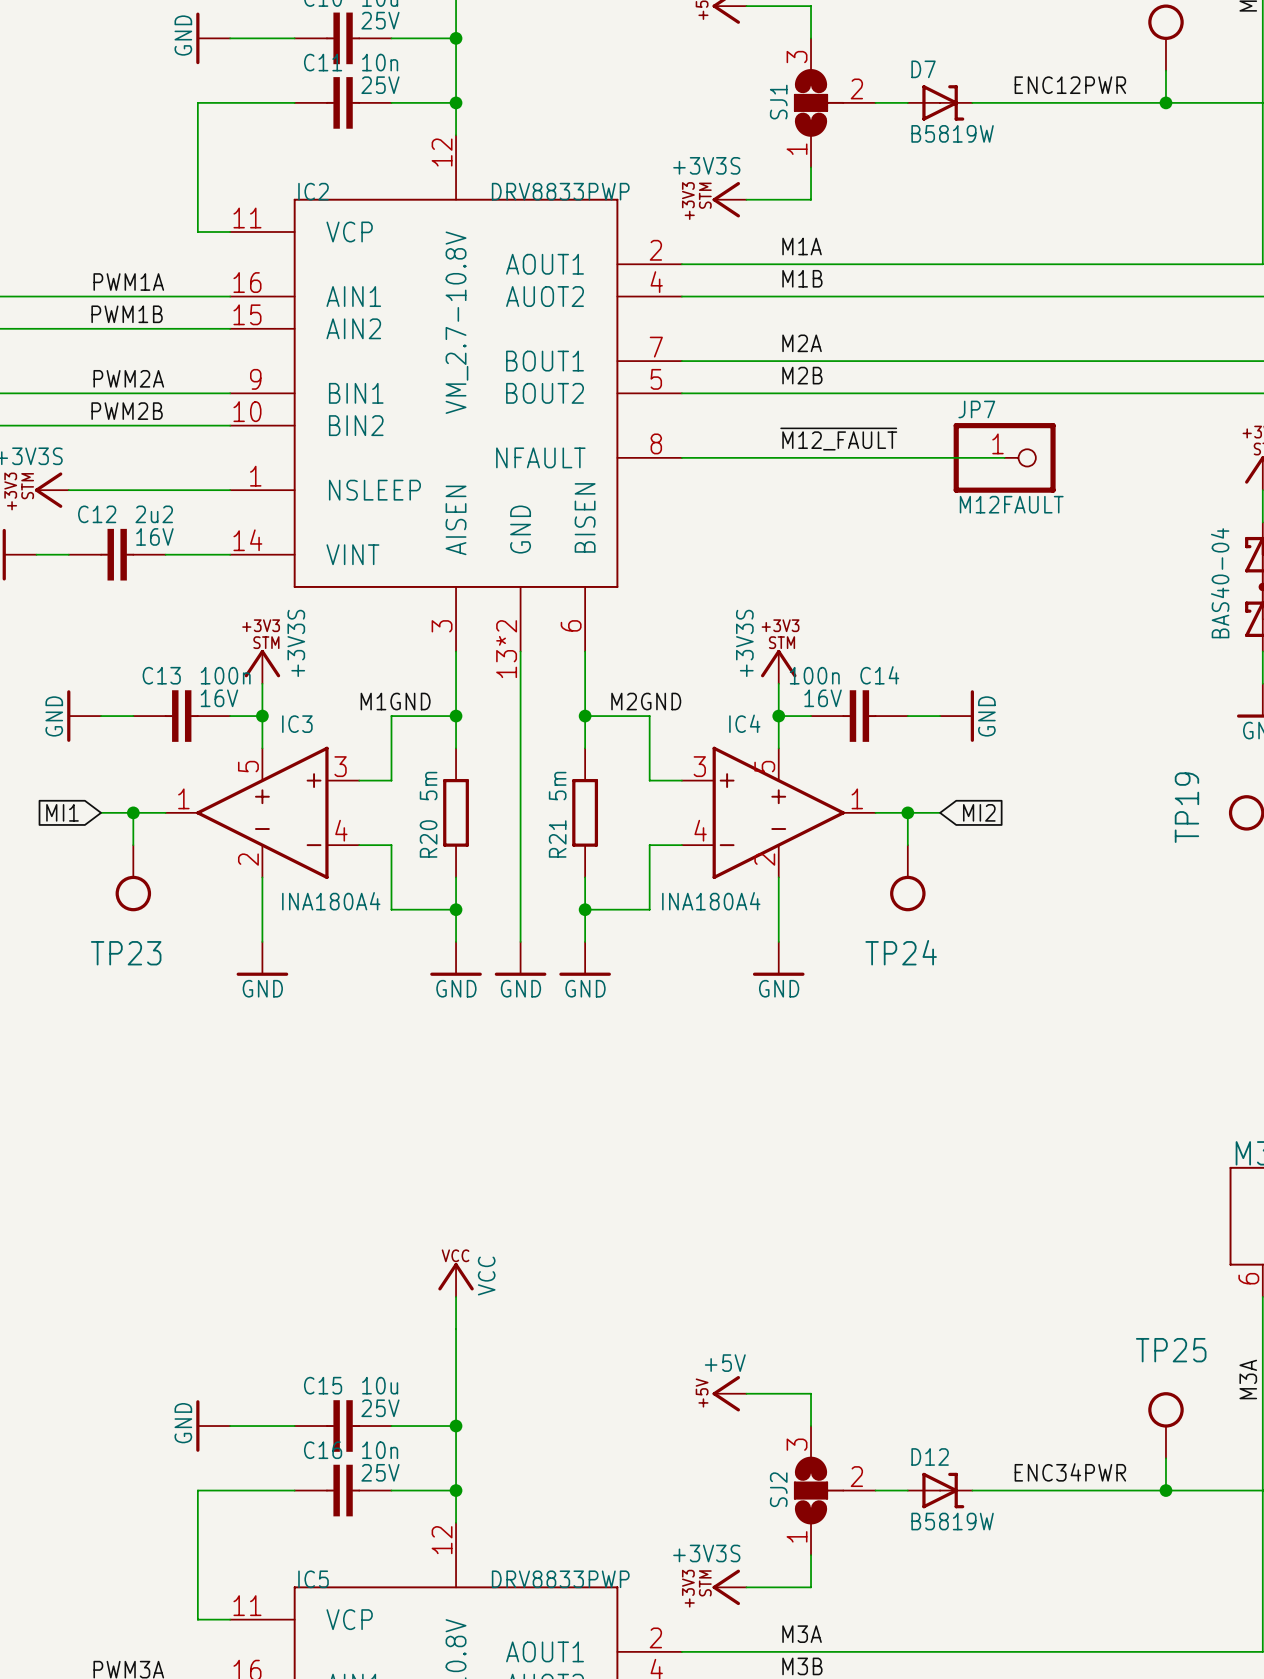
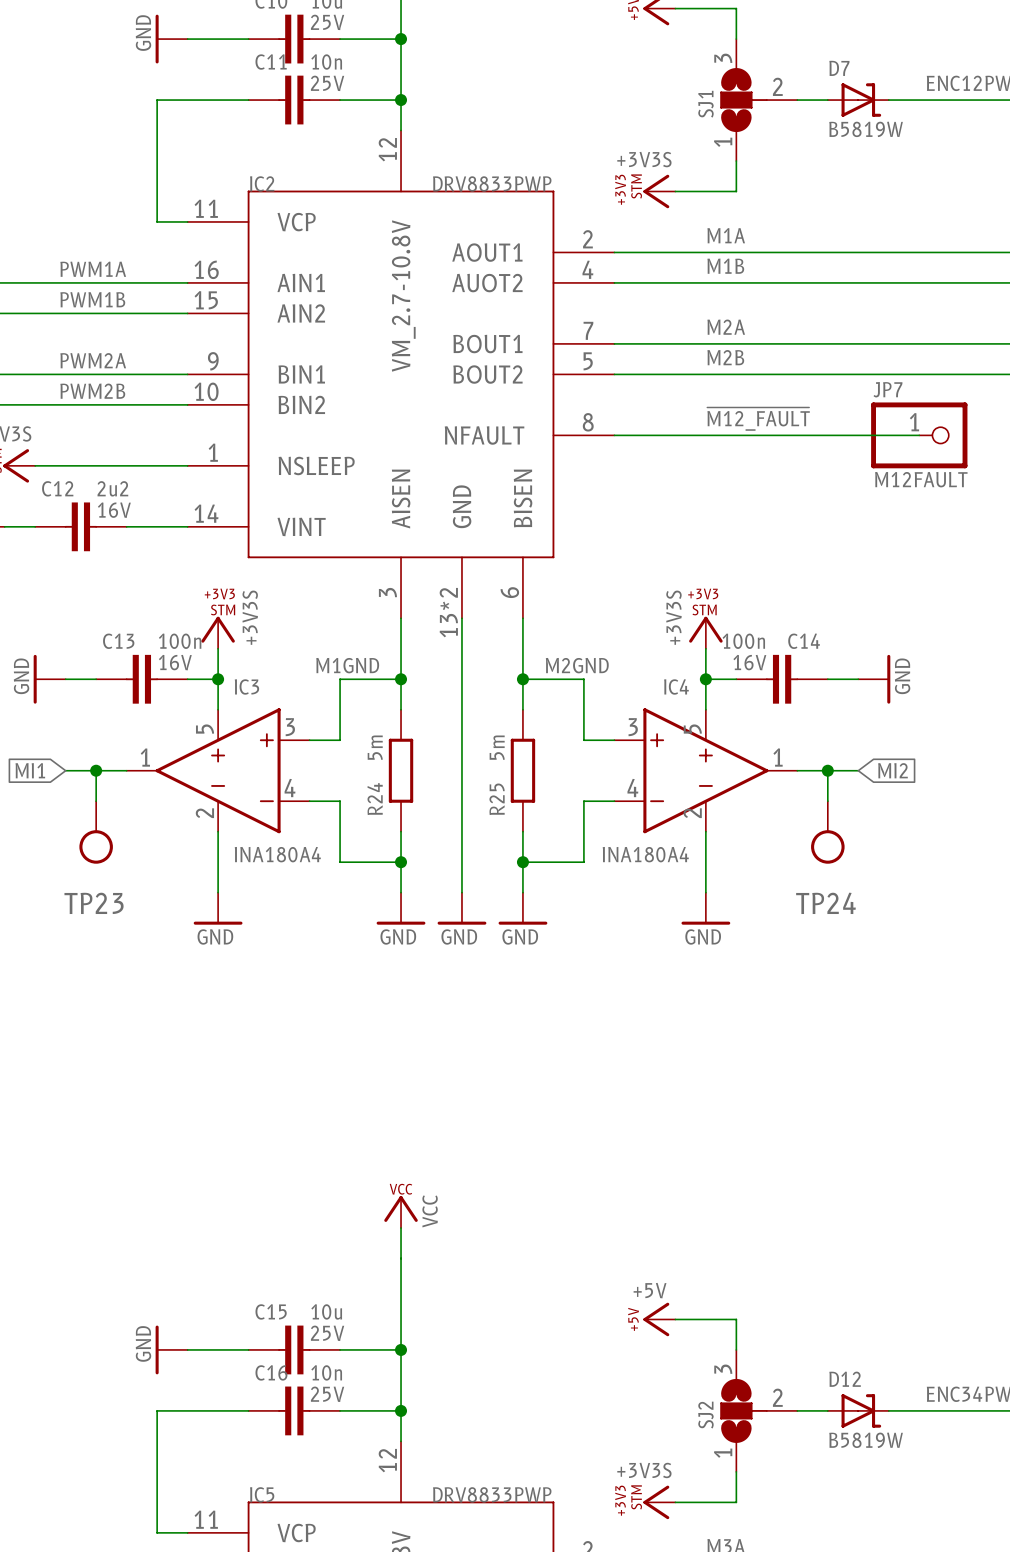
R20 name: R20 (428, 838) -> R24 (375, 799)
R21 name: R21 (557, 838) -> R25 (497, 799)

